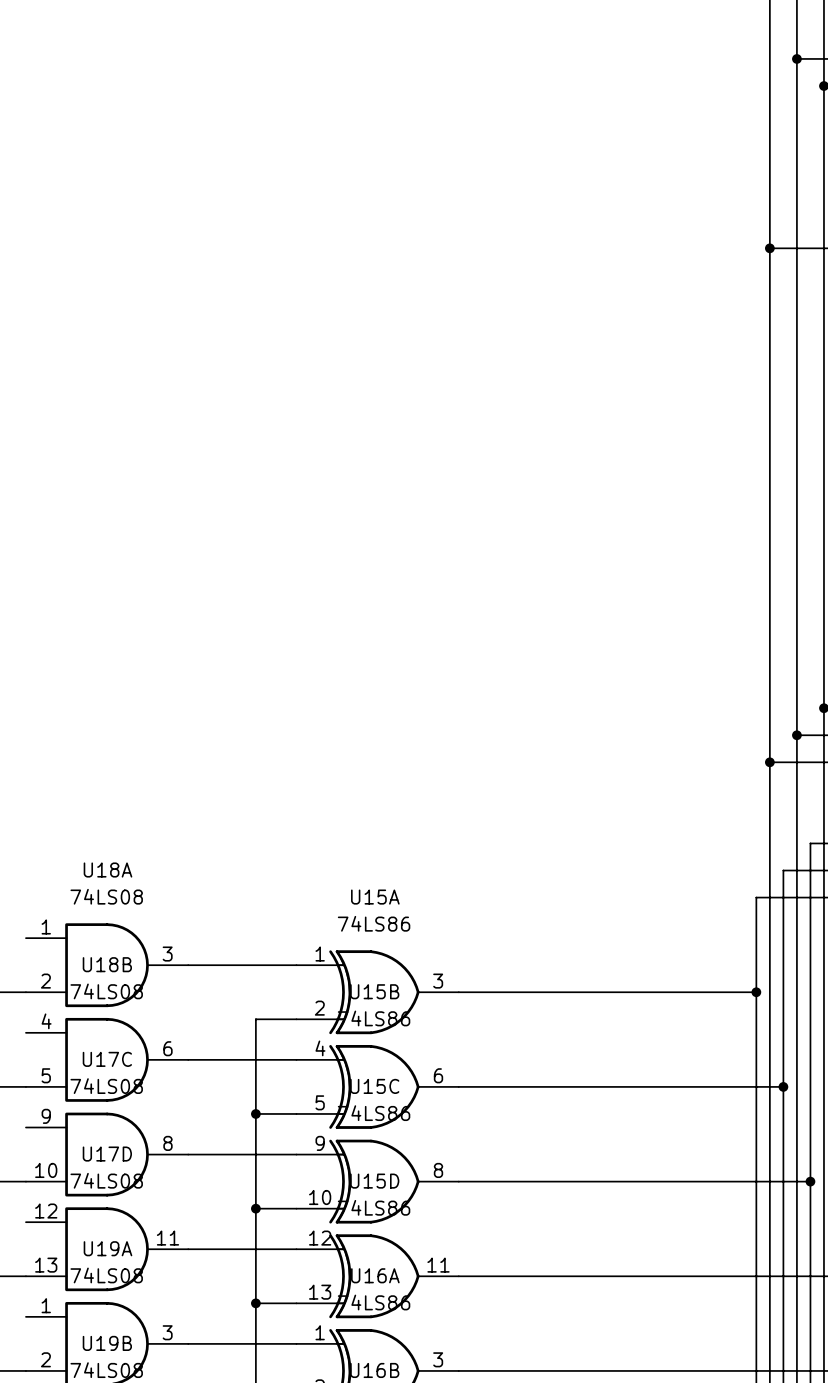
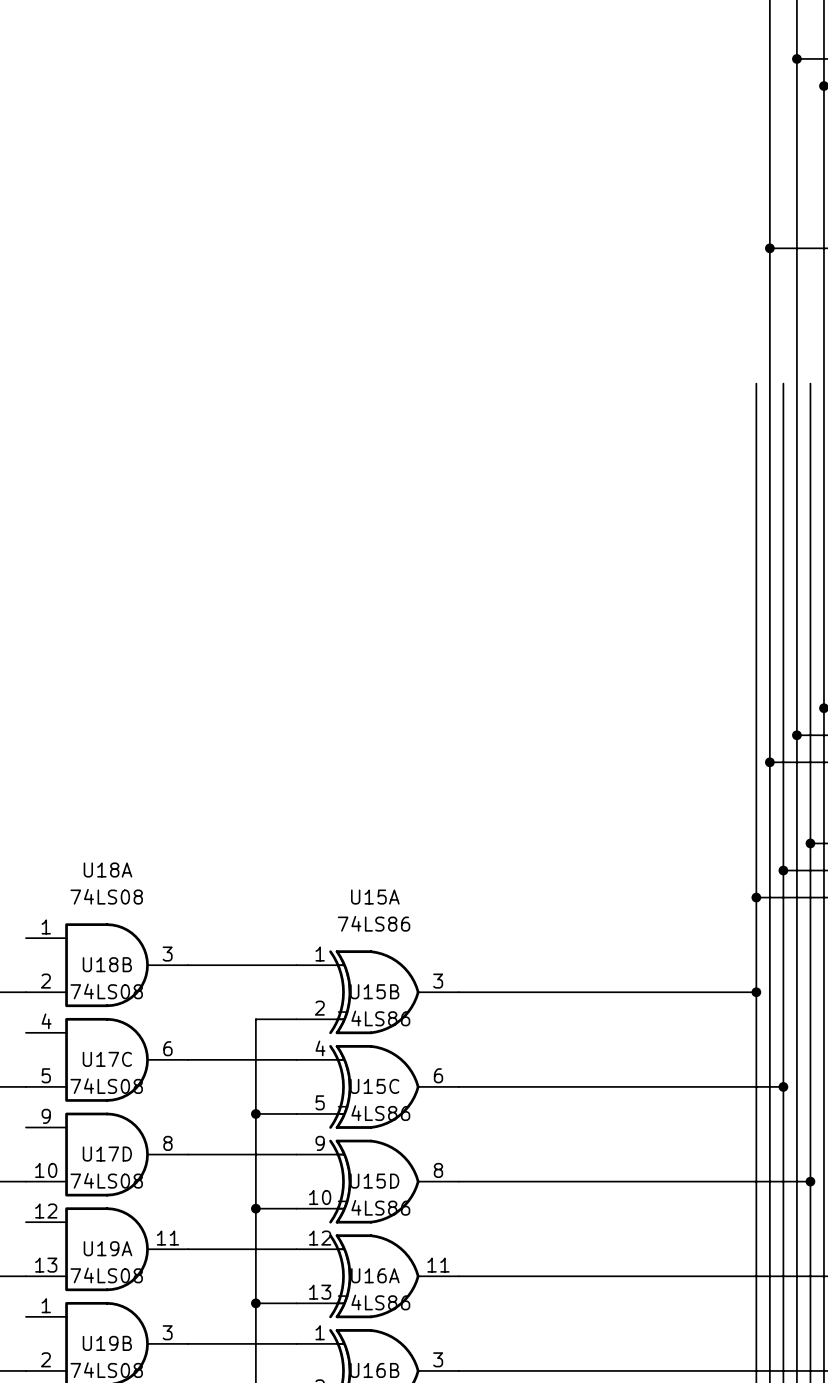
wire: none -> (756, 383) (756, 897)
wire: none -> (783, 383) (783, 870)
wire: none -> (810, 383) (810, 843)
junction: none -> (810, 843)
junction: none -> (783, 870)
junction: none -> (756, 897)

